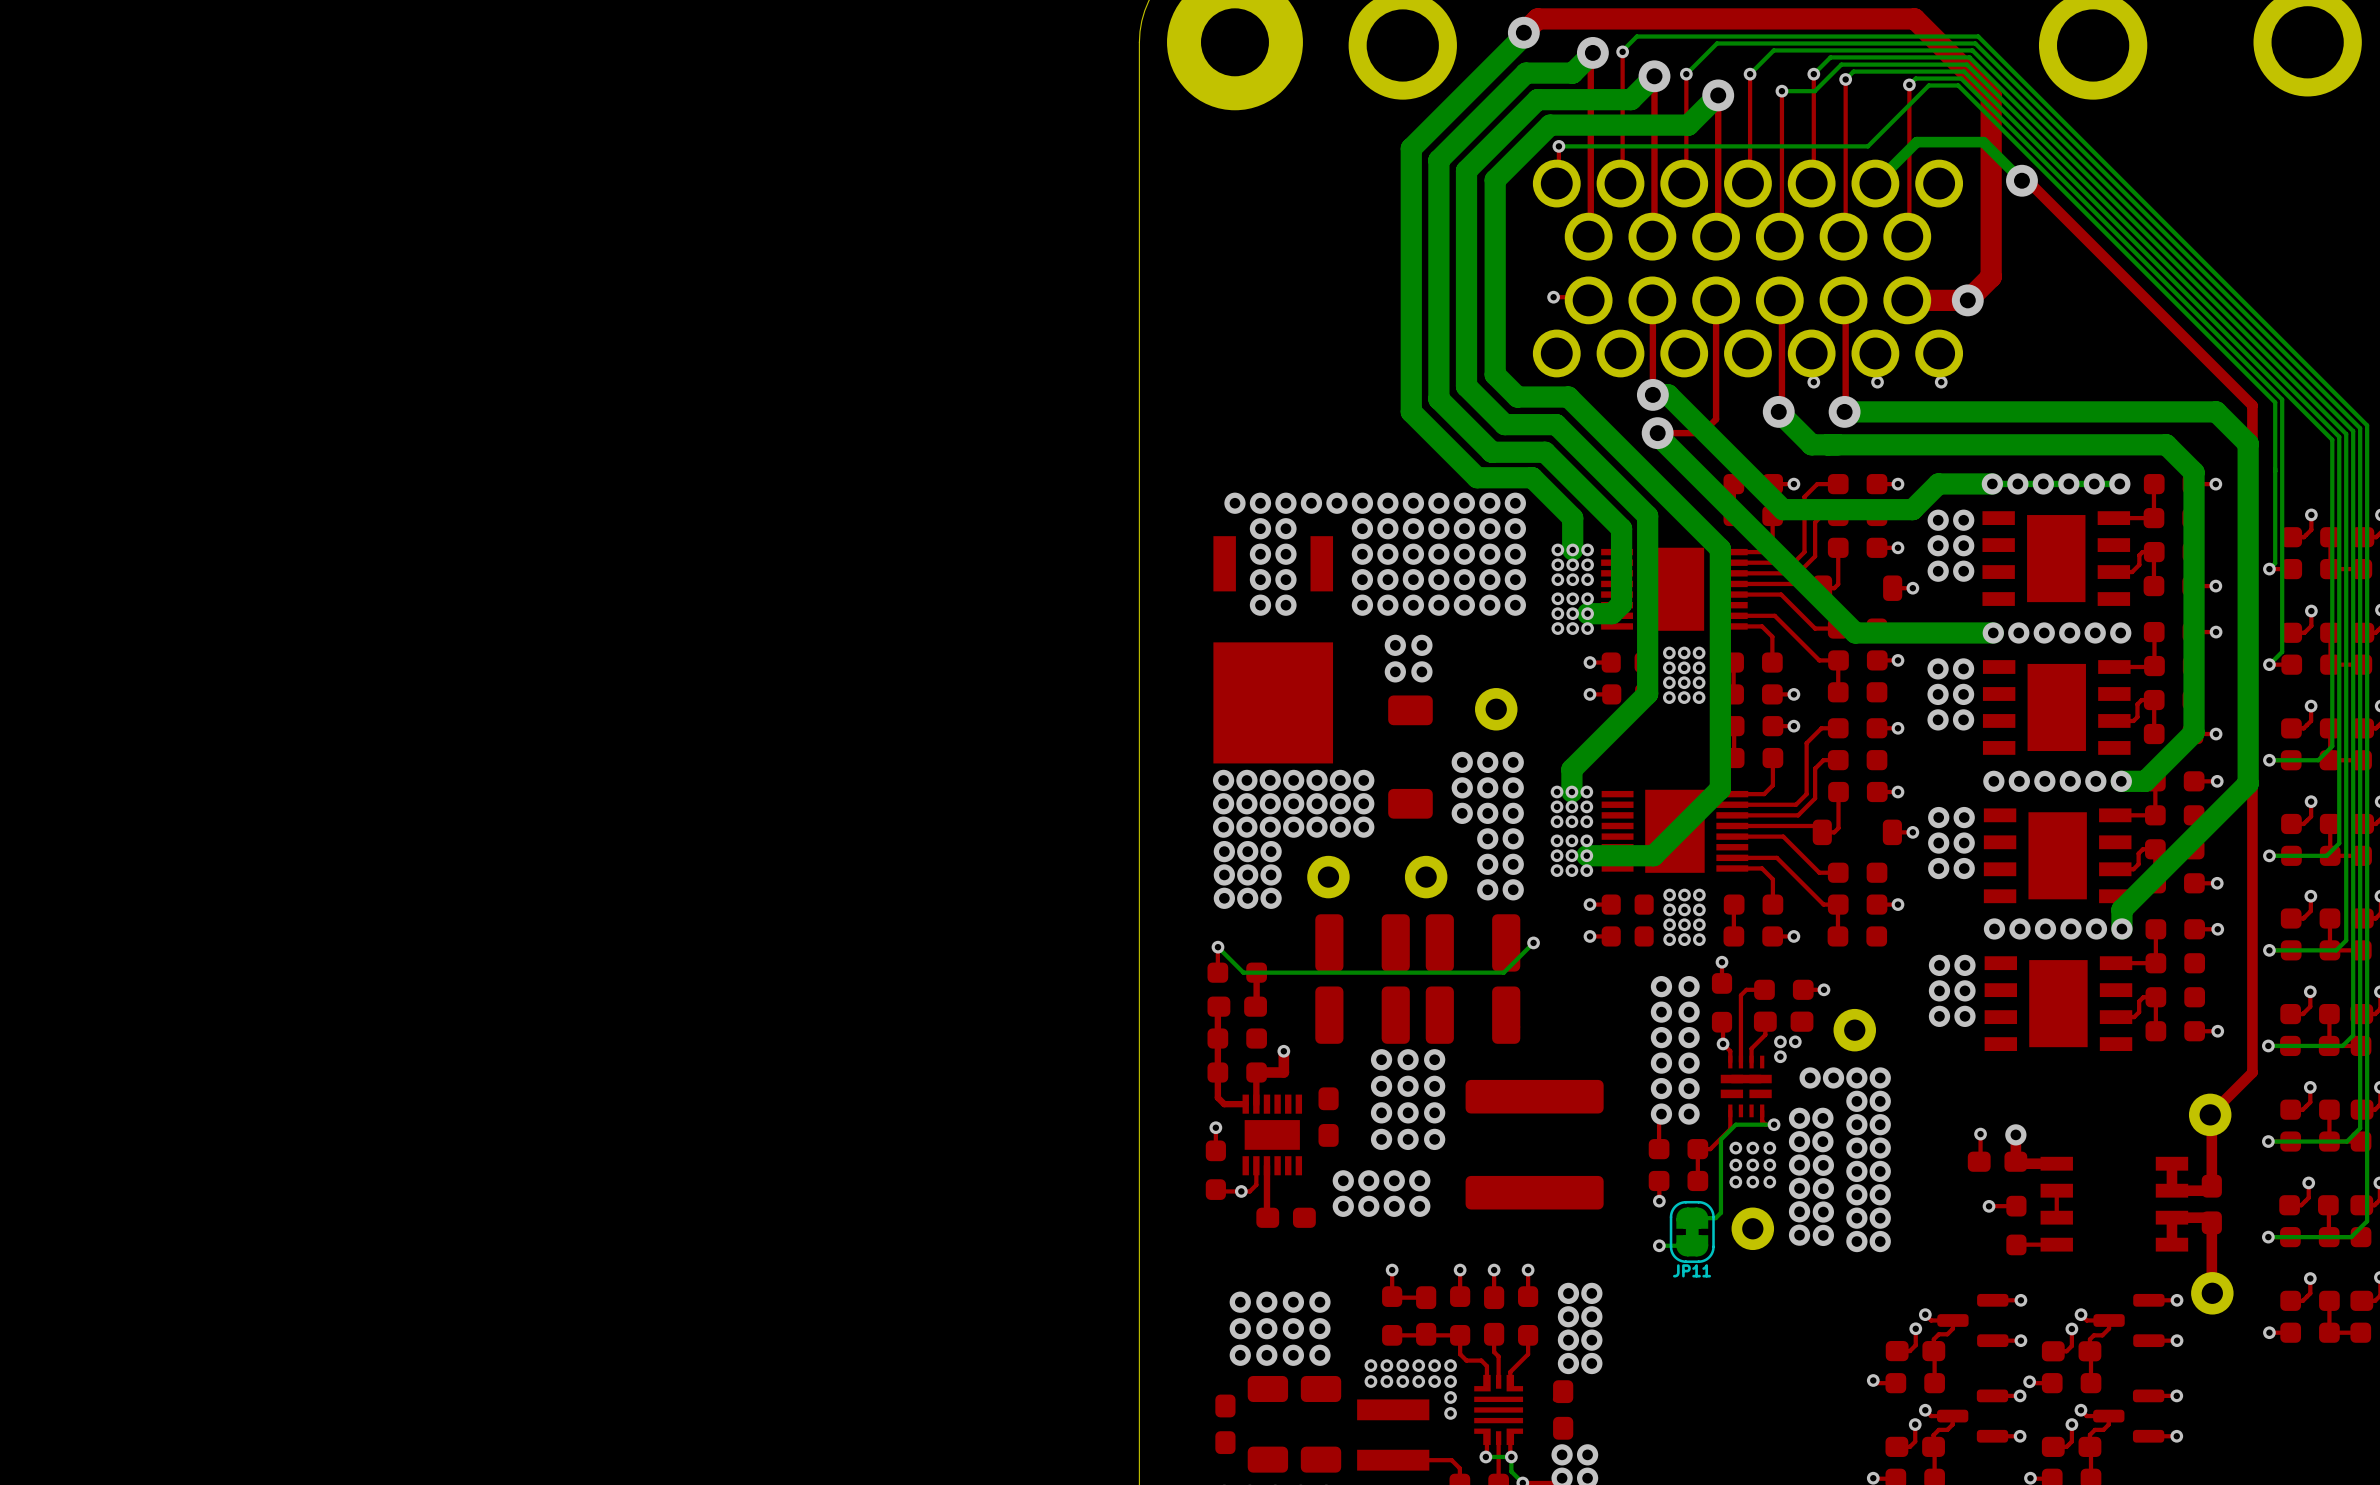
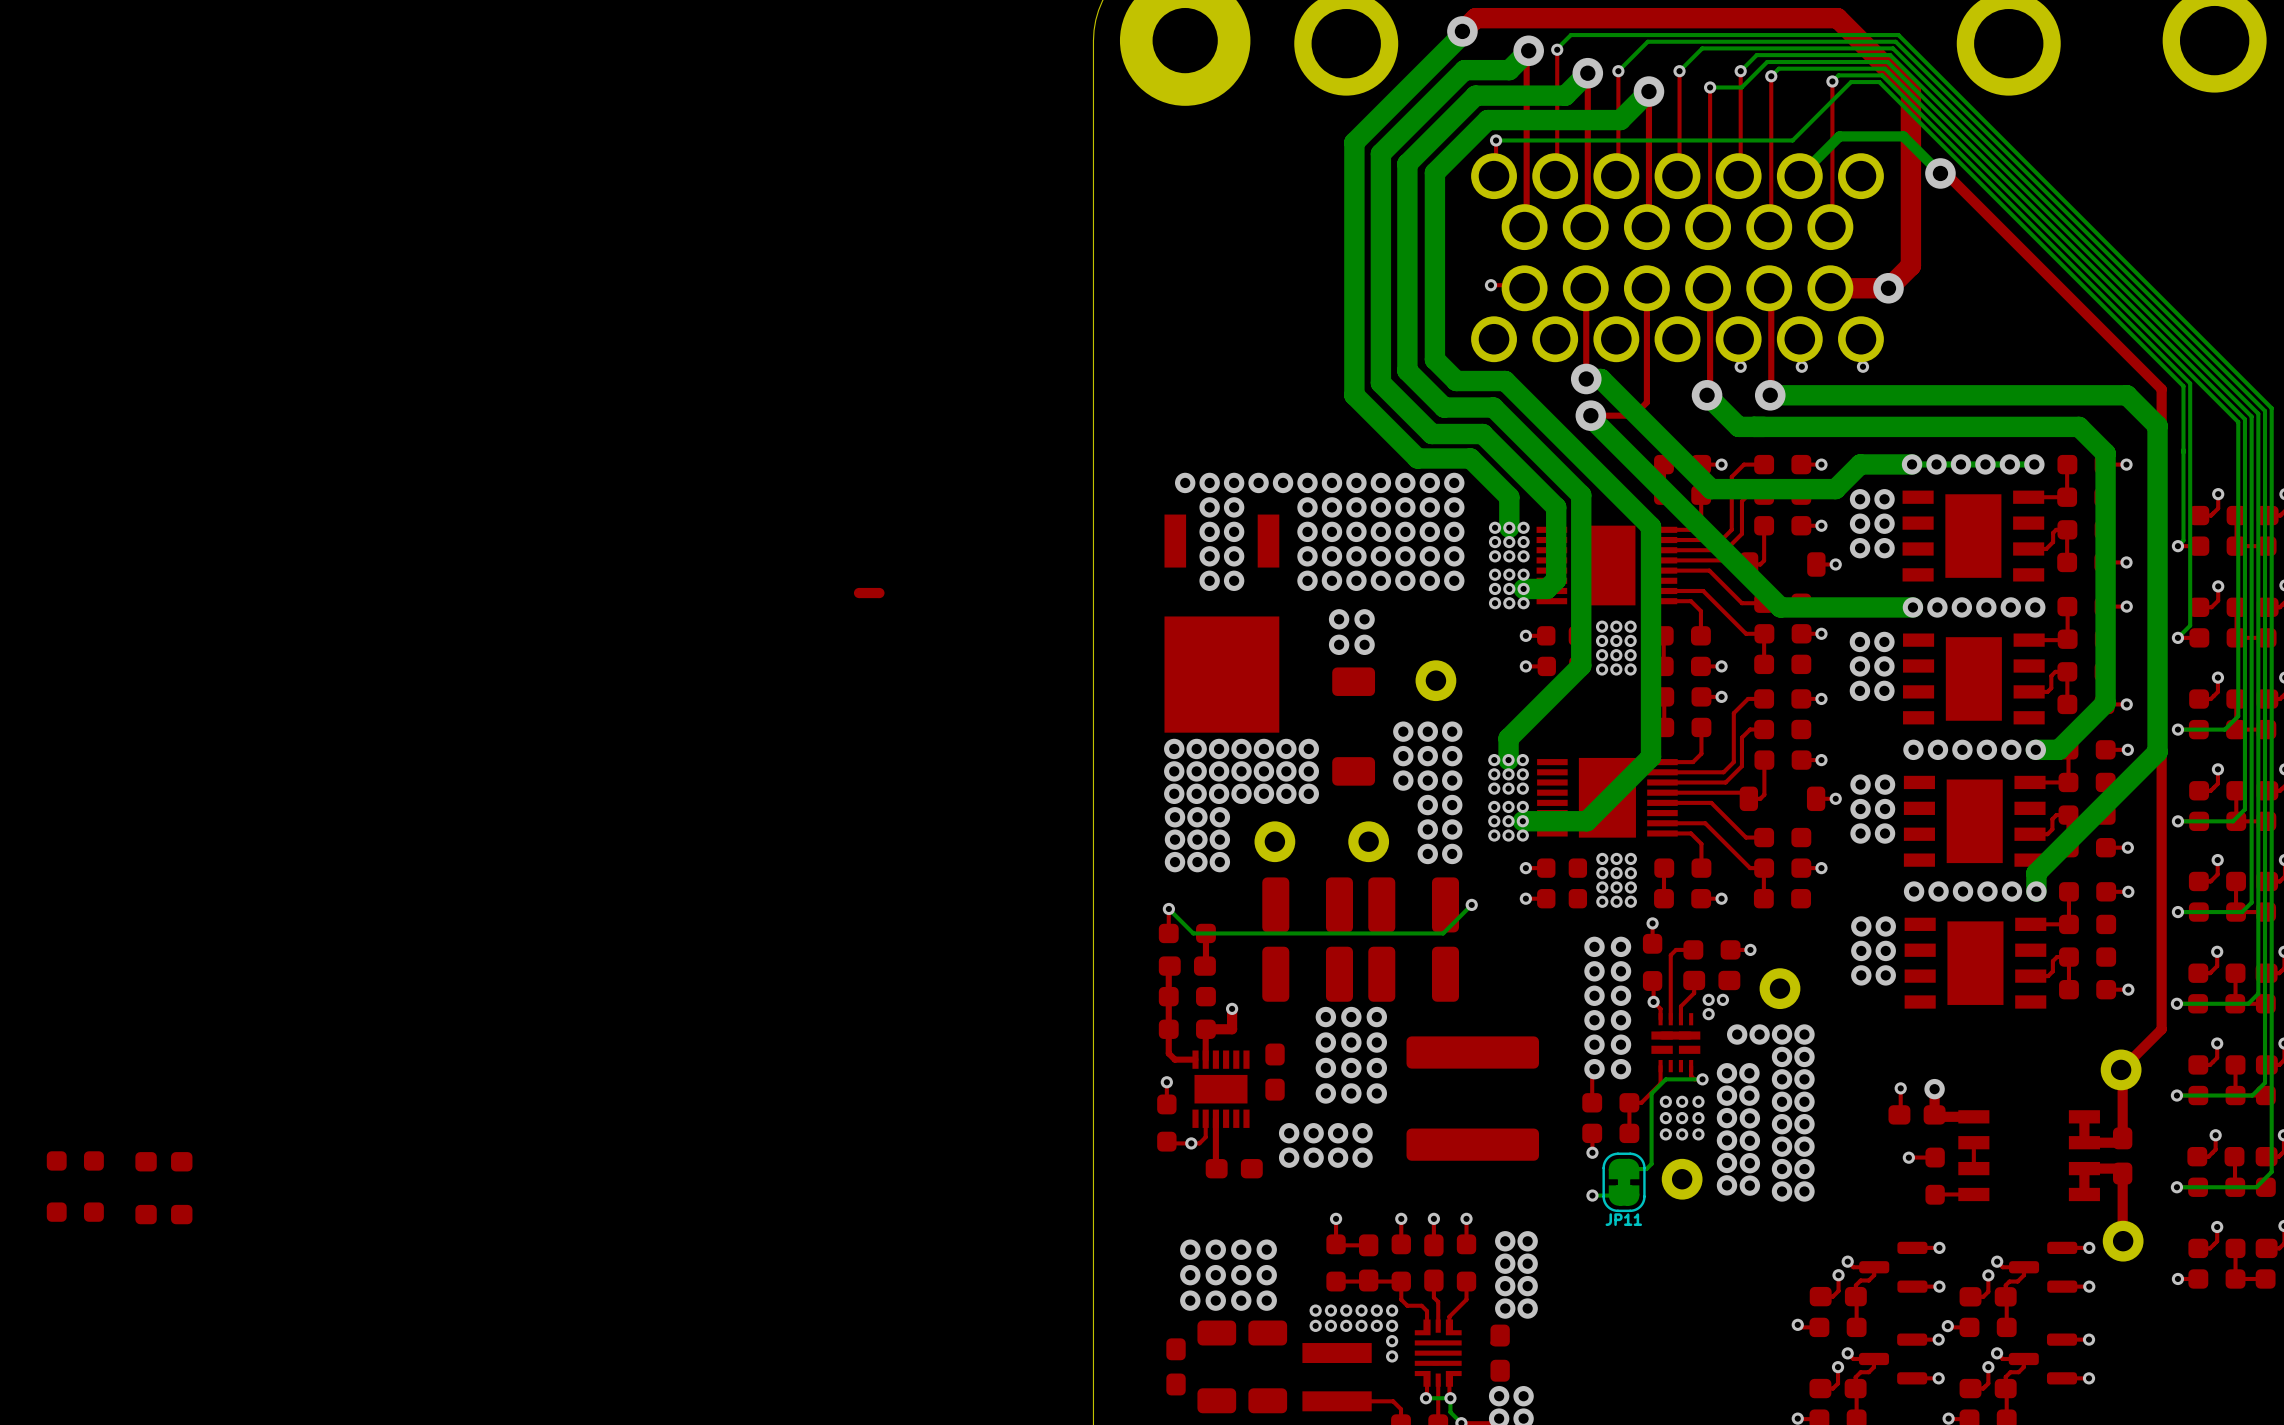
part: none -> (869, 593)
part: none -> (75, 1160)
part: none -> (163, 1161)
part: none -> (75, 1212)
part: none -> (163, 1214)

